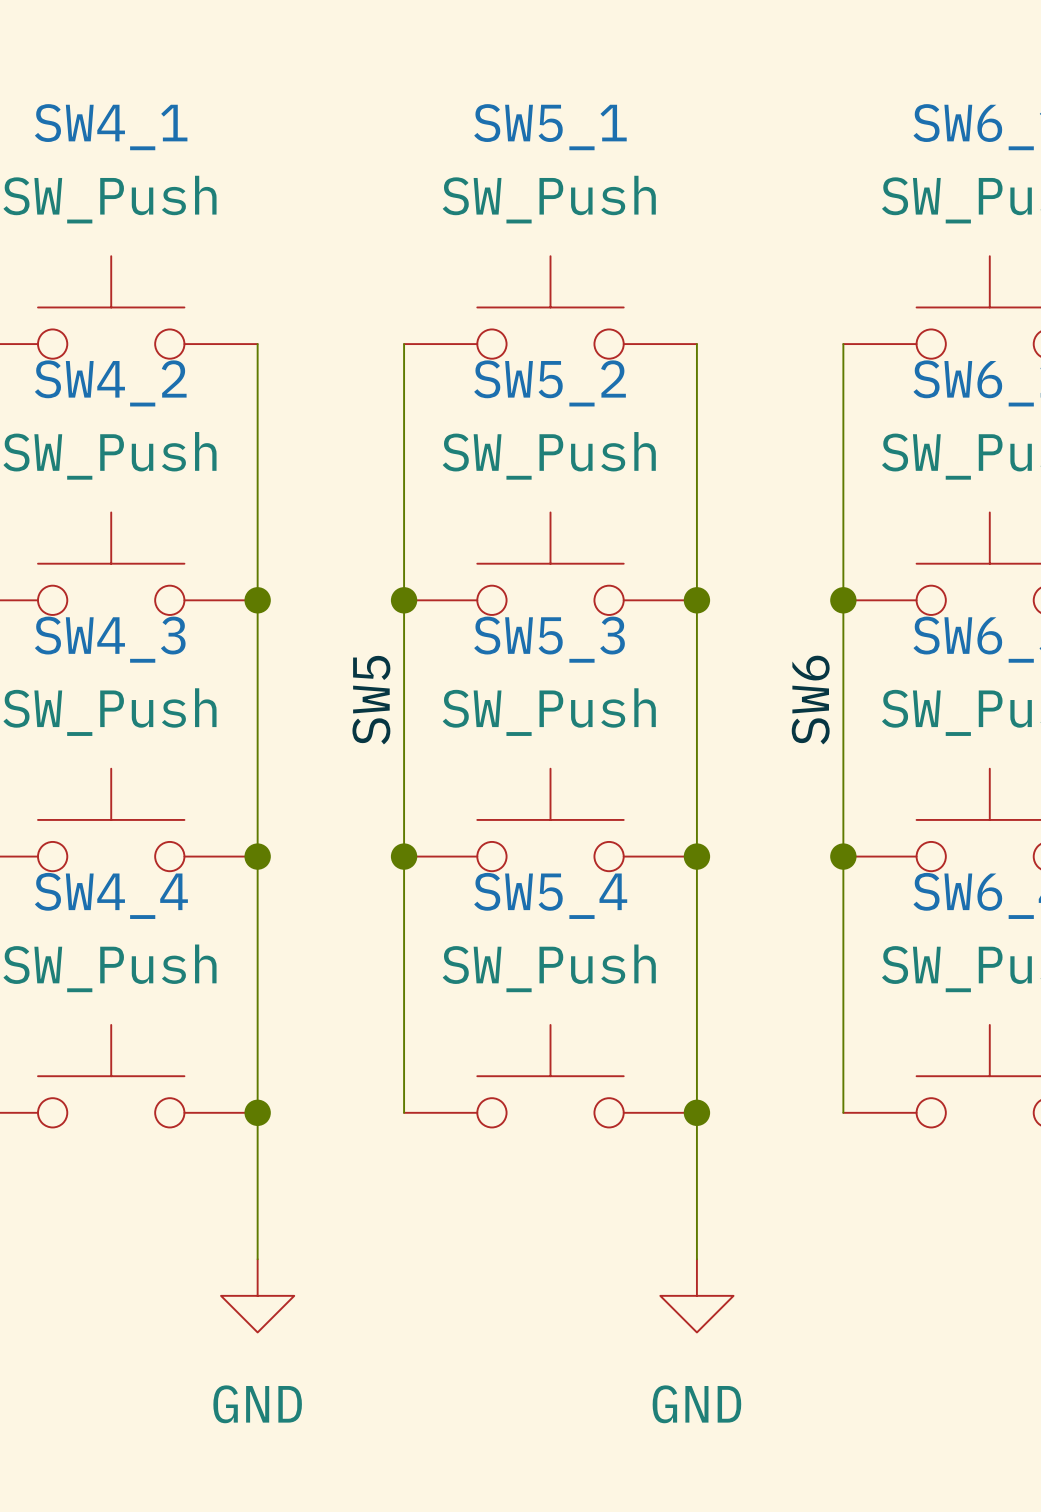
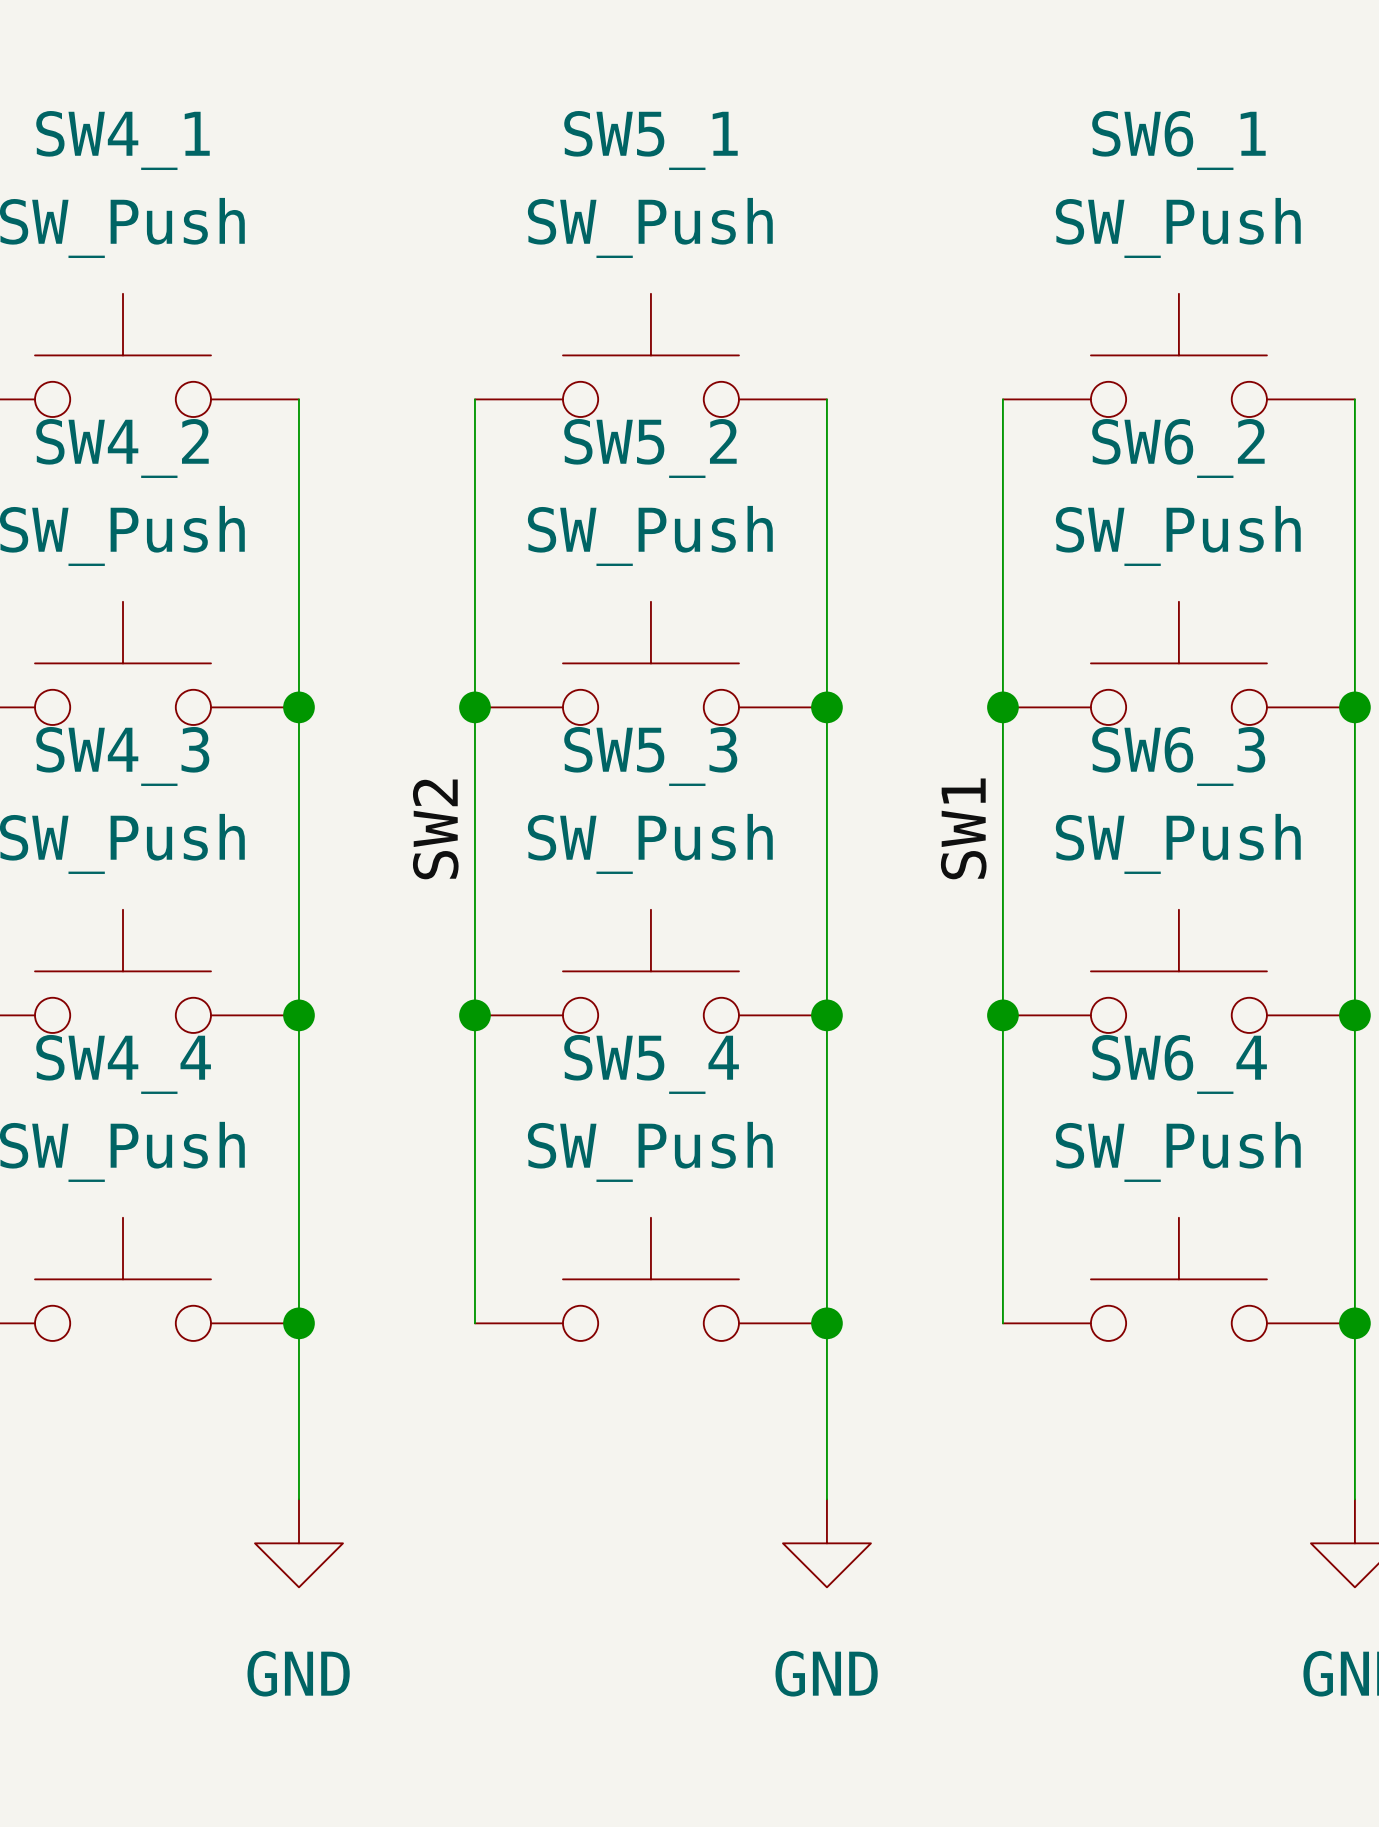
label: SW5 (371, 700) -> SW2 (435, 829)
label: SW6 (810, 700) -> SW1 (963, 828)

